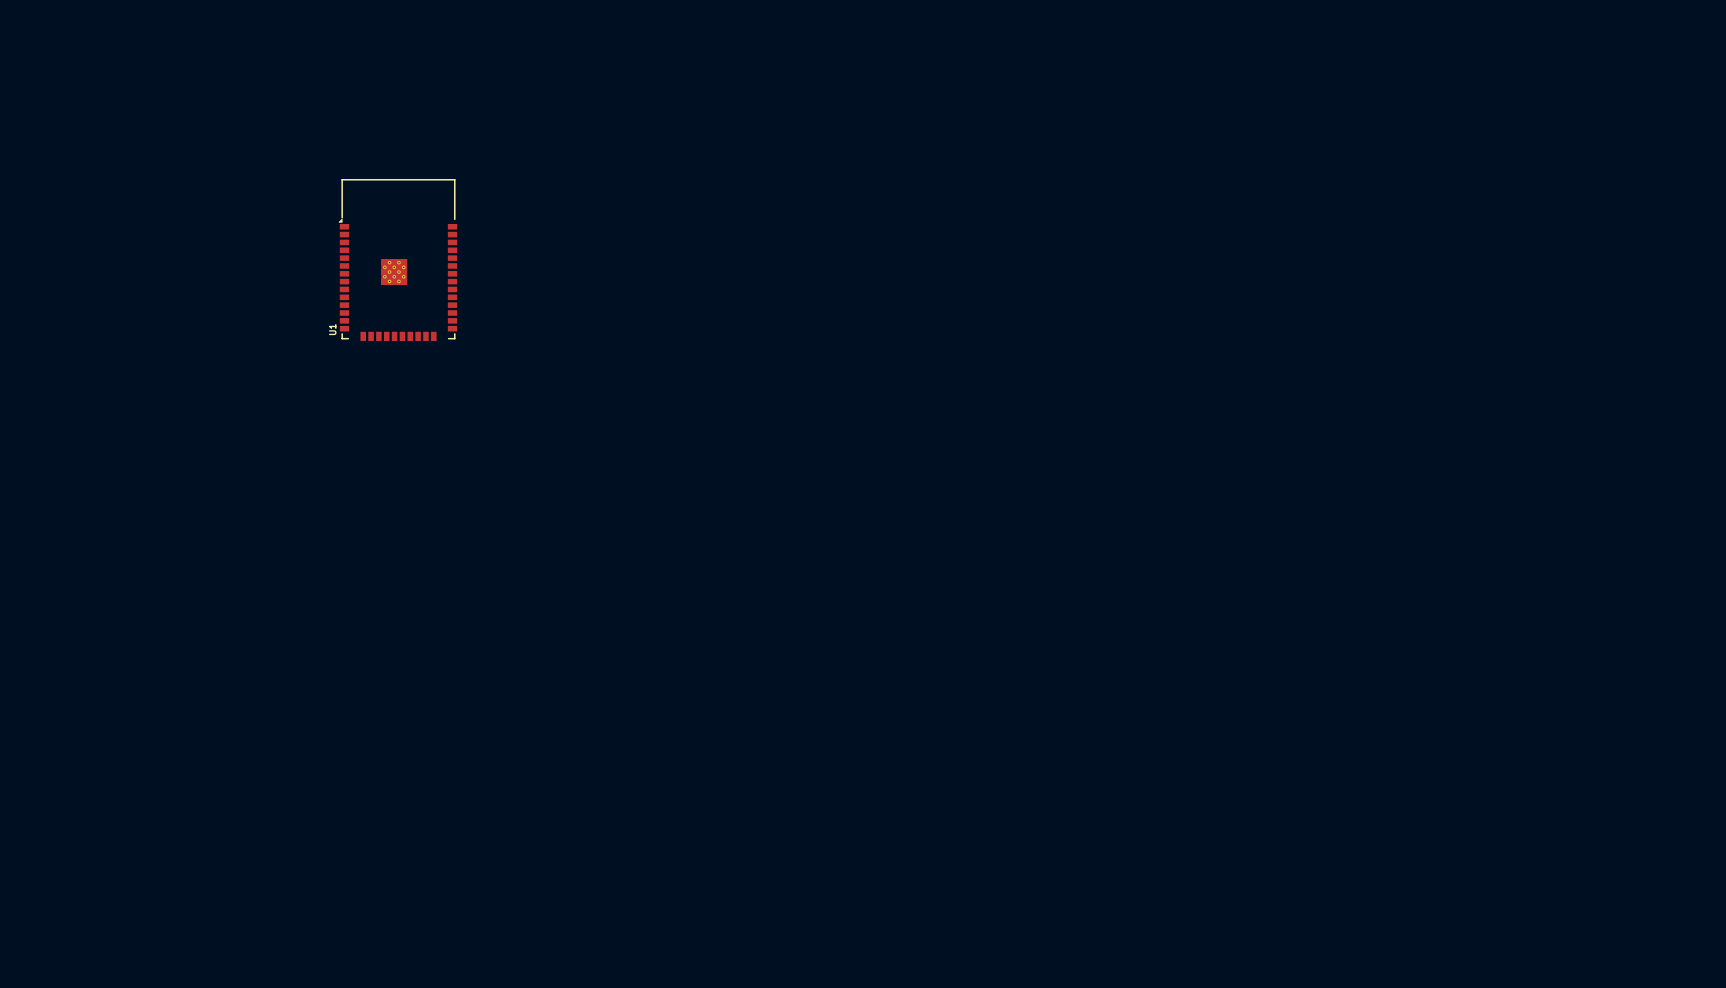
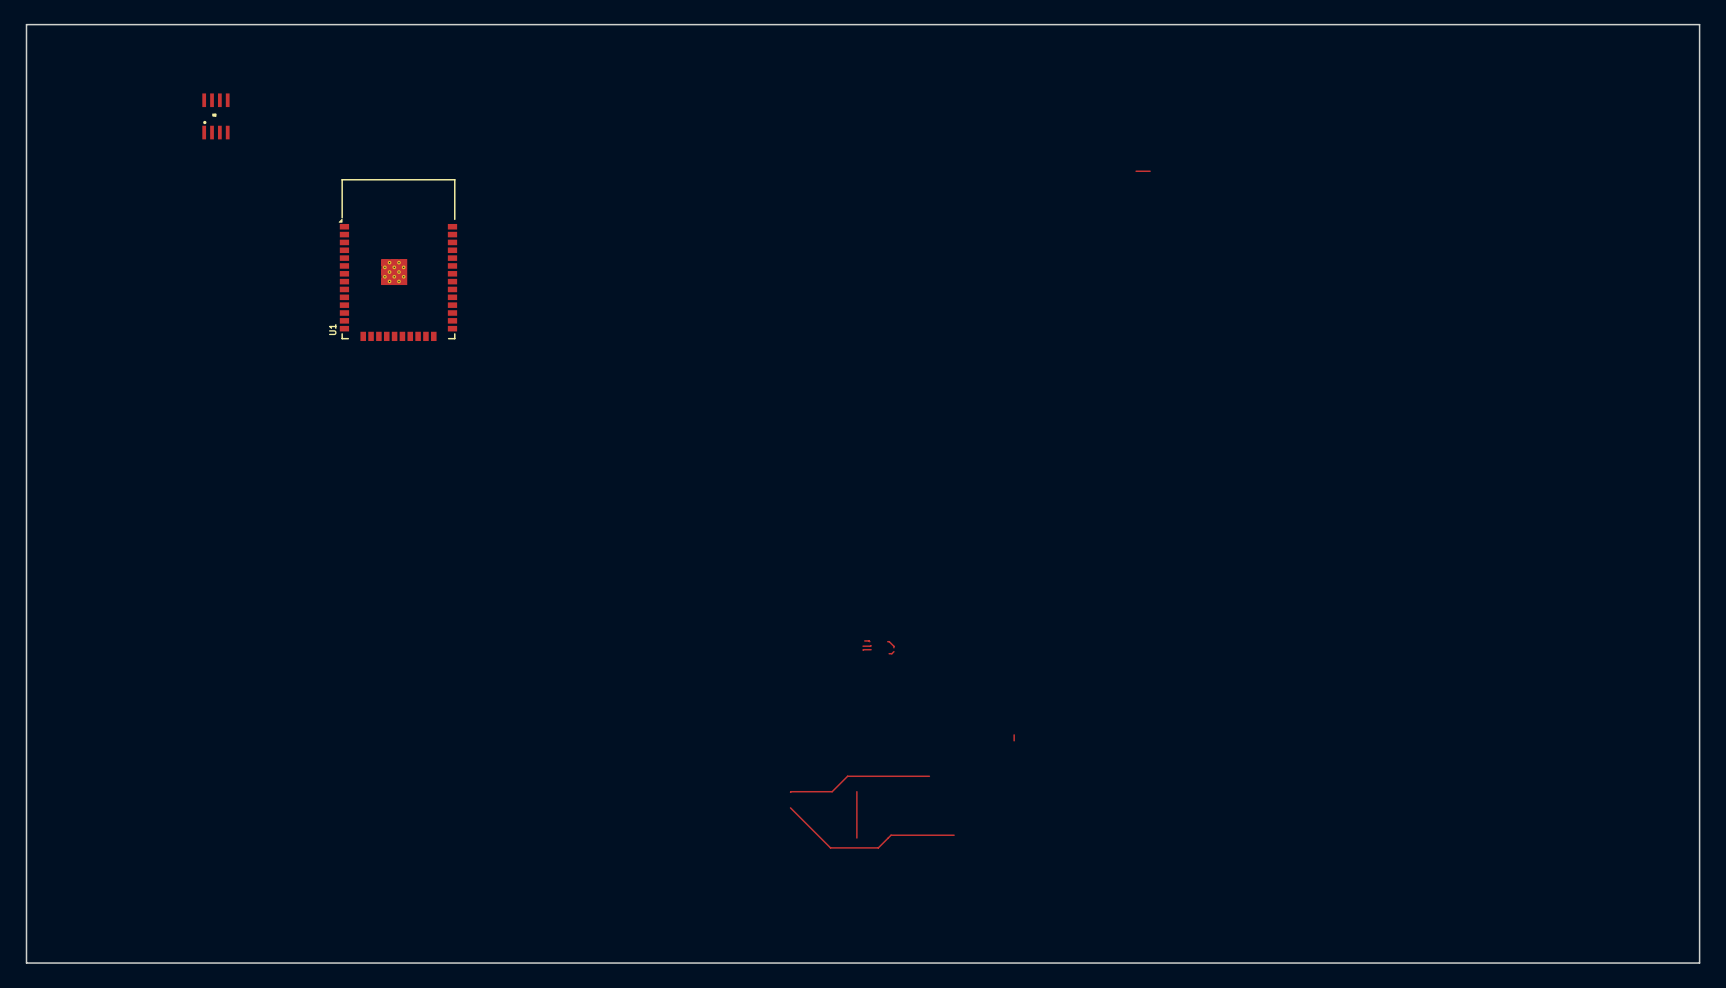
board edge: none -> (26, 24) (1699, 24) (1699, 963) (26, 963) (26, 24)
part: none -> (215, 116)
track: none -> (1136, 171) (1150, 171)
track: none -> (864, 640) (869, 641)
track: none -> (887, 641) (893, 647)
track: none -> (871, 645) (863, 646)
track: none -> (871, 649) (863, 650)
track: none -> (893, 651) (889, 653)
track: none -> (1014, 734) (1014, 740)
track: none -> (929, 776) (847, 776) (832, 791) (790, 792)
track: none -> (856, 791) (856, 838)
track: none -> (790, 807) (830, 847) (878, 847) (891, 835) (954, 835)

